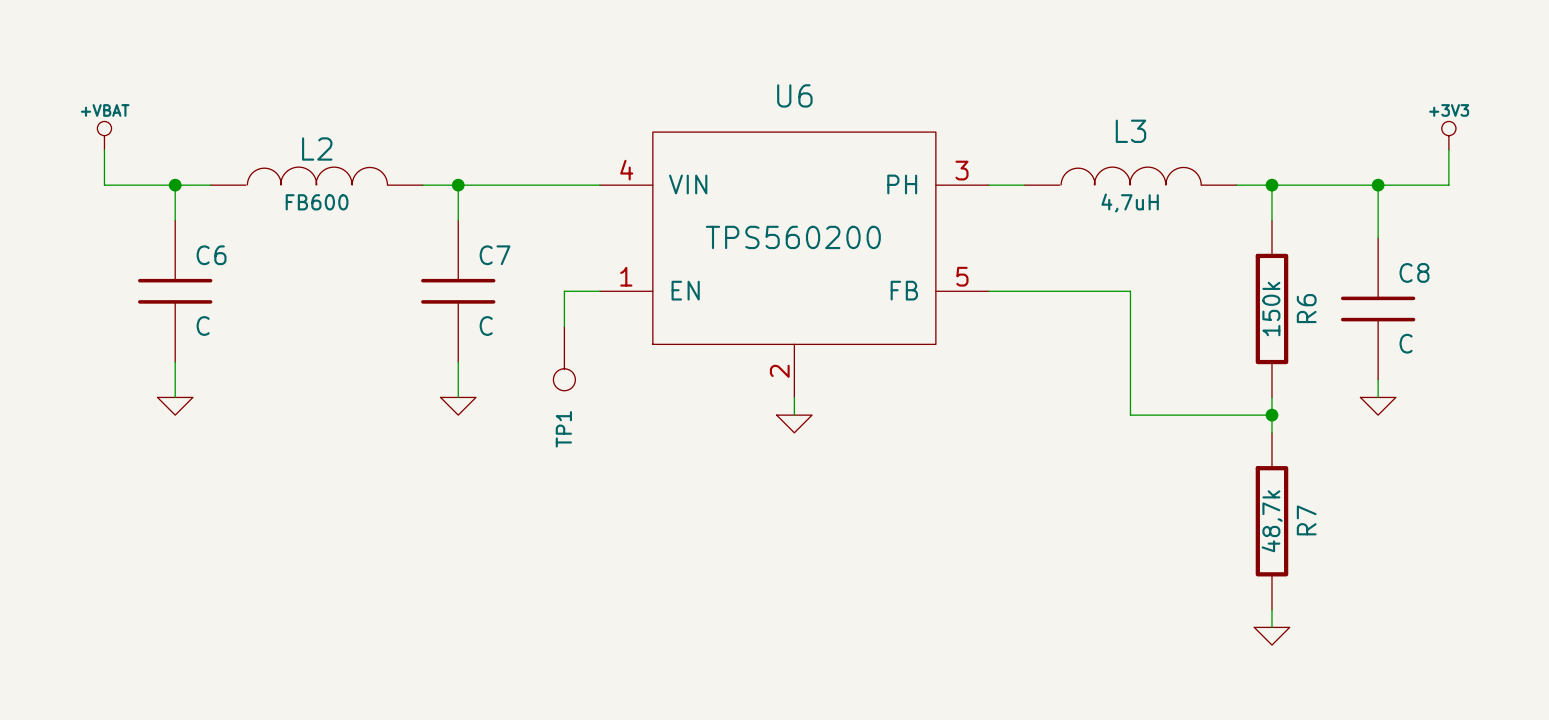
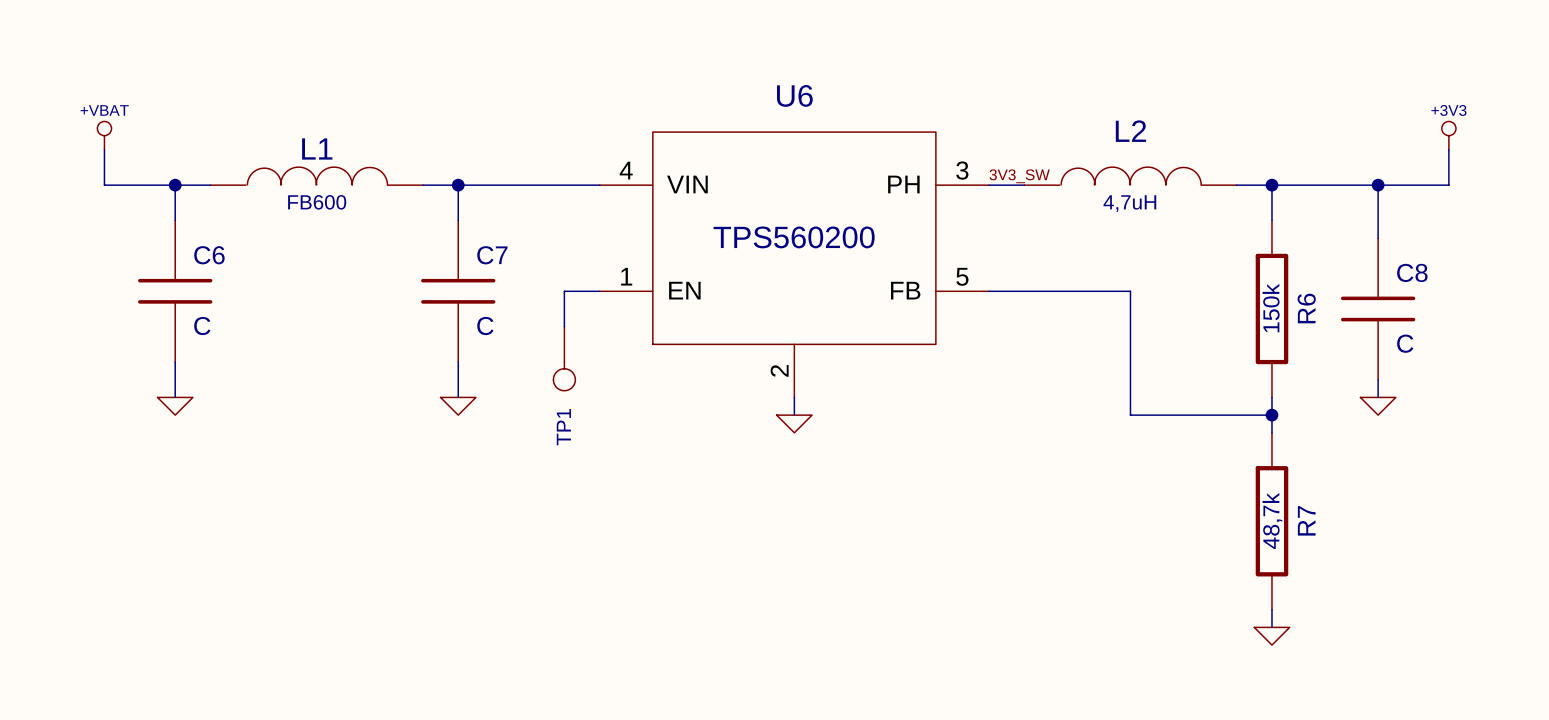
L3 name: L3 (1130, 131) -> L2 (1130, 131)
L2 name: L2 (317, 148) -> L1 (317, 148)
label: none -> 3V3_SW (1019, 176)

